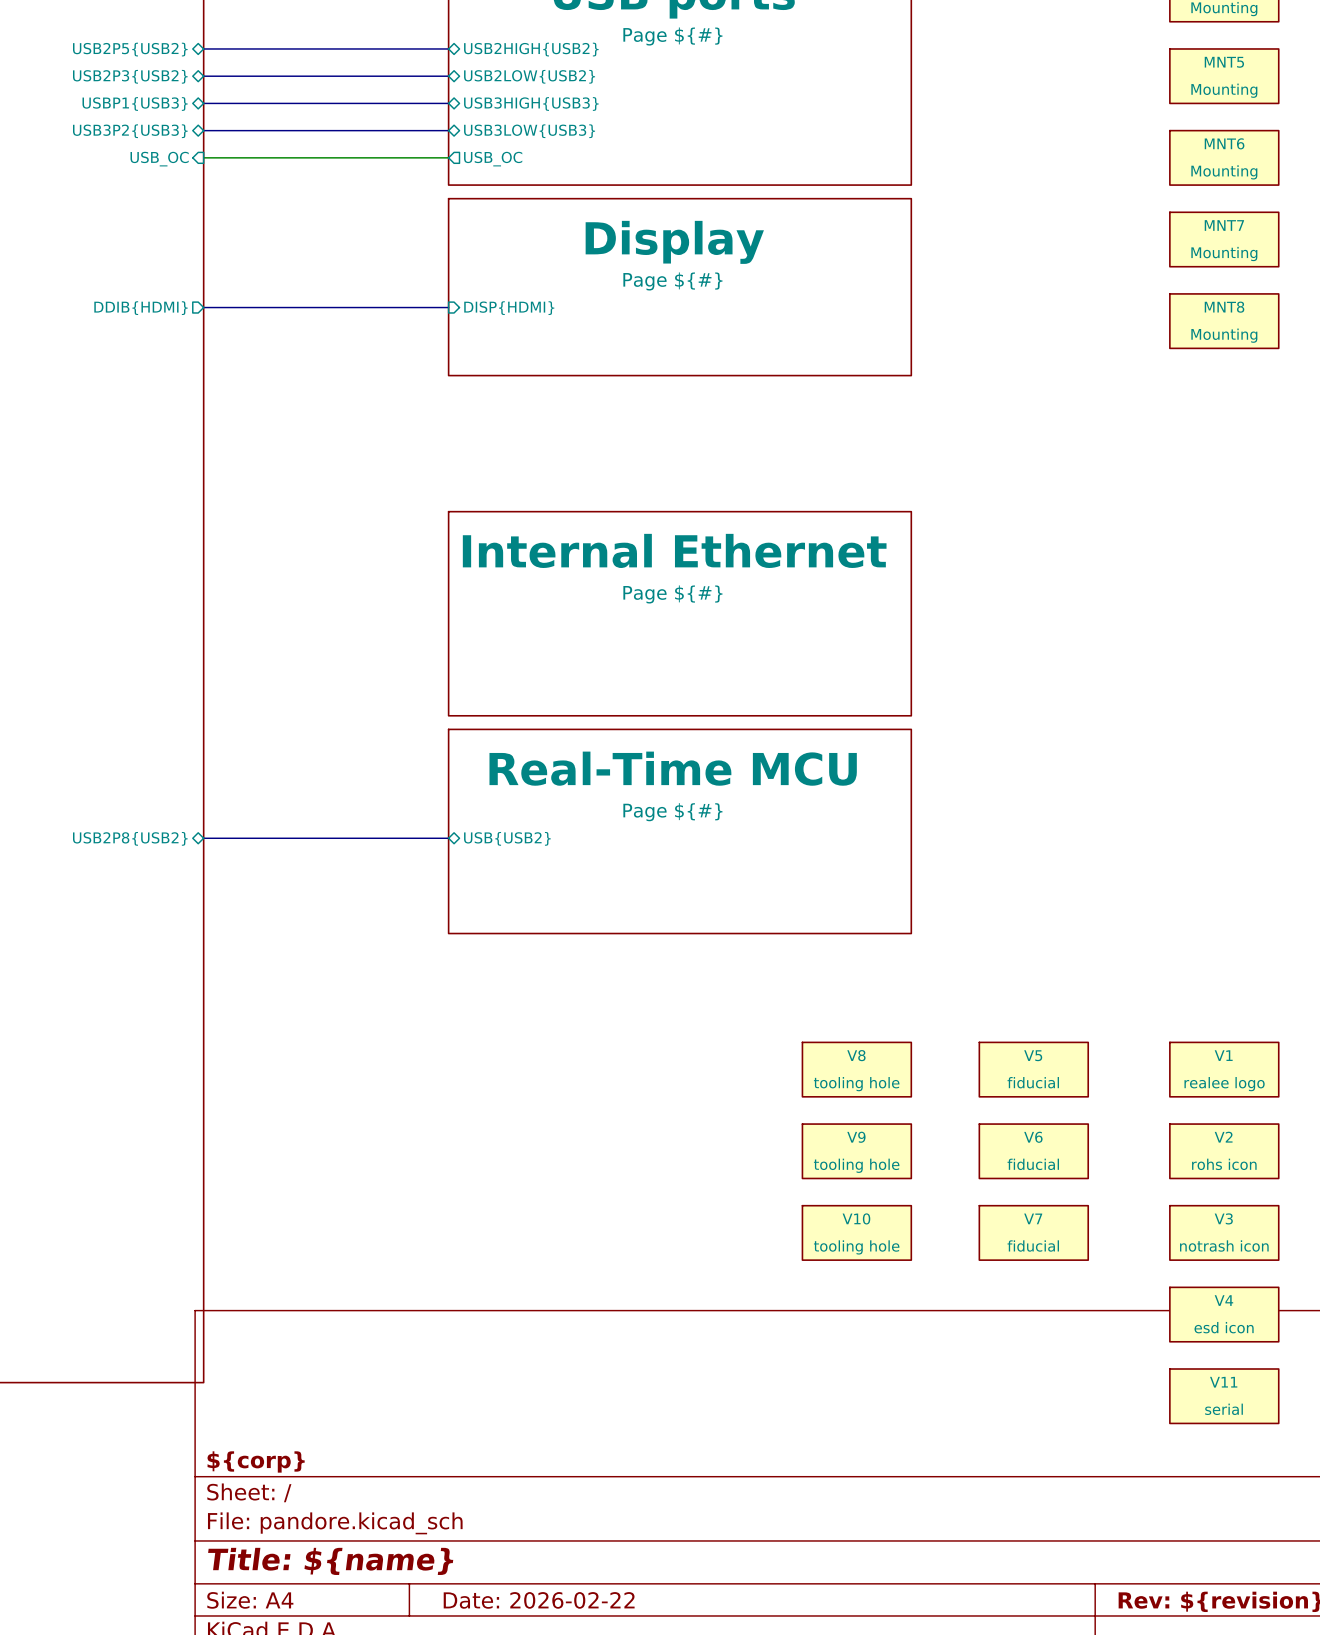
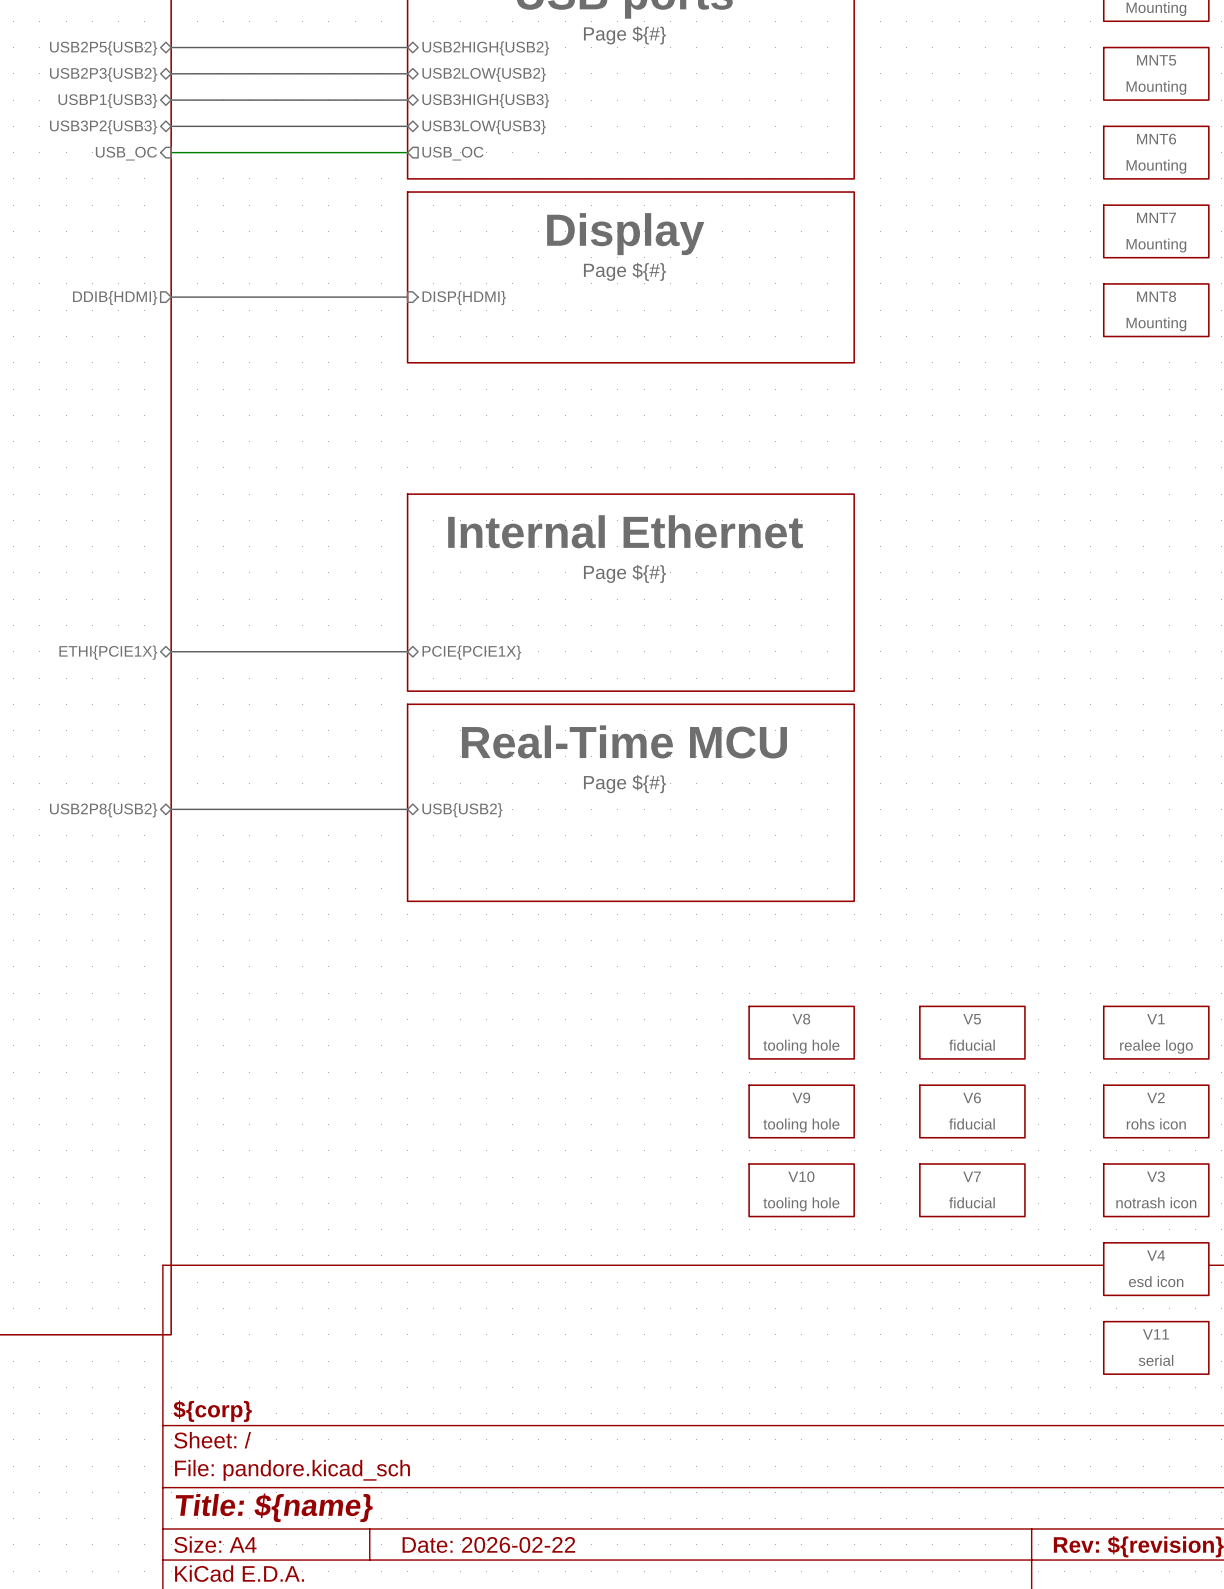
bus: none -> (171, 651) (407, 651)
sheet pin: none -> ETHI{PCIE1X} (108, 652)
sheet pin: none -> PCIE{PCIE1X} (471, 652)

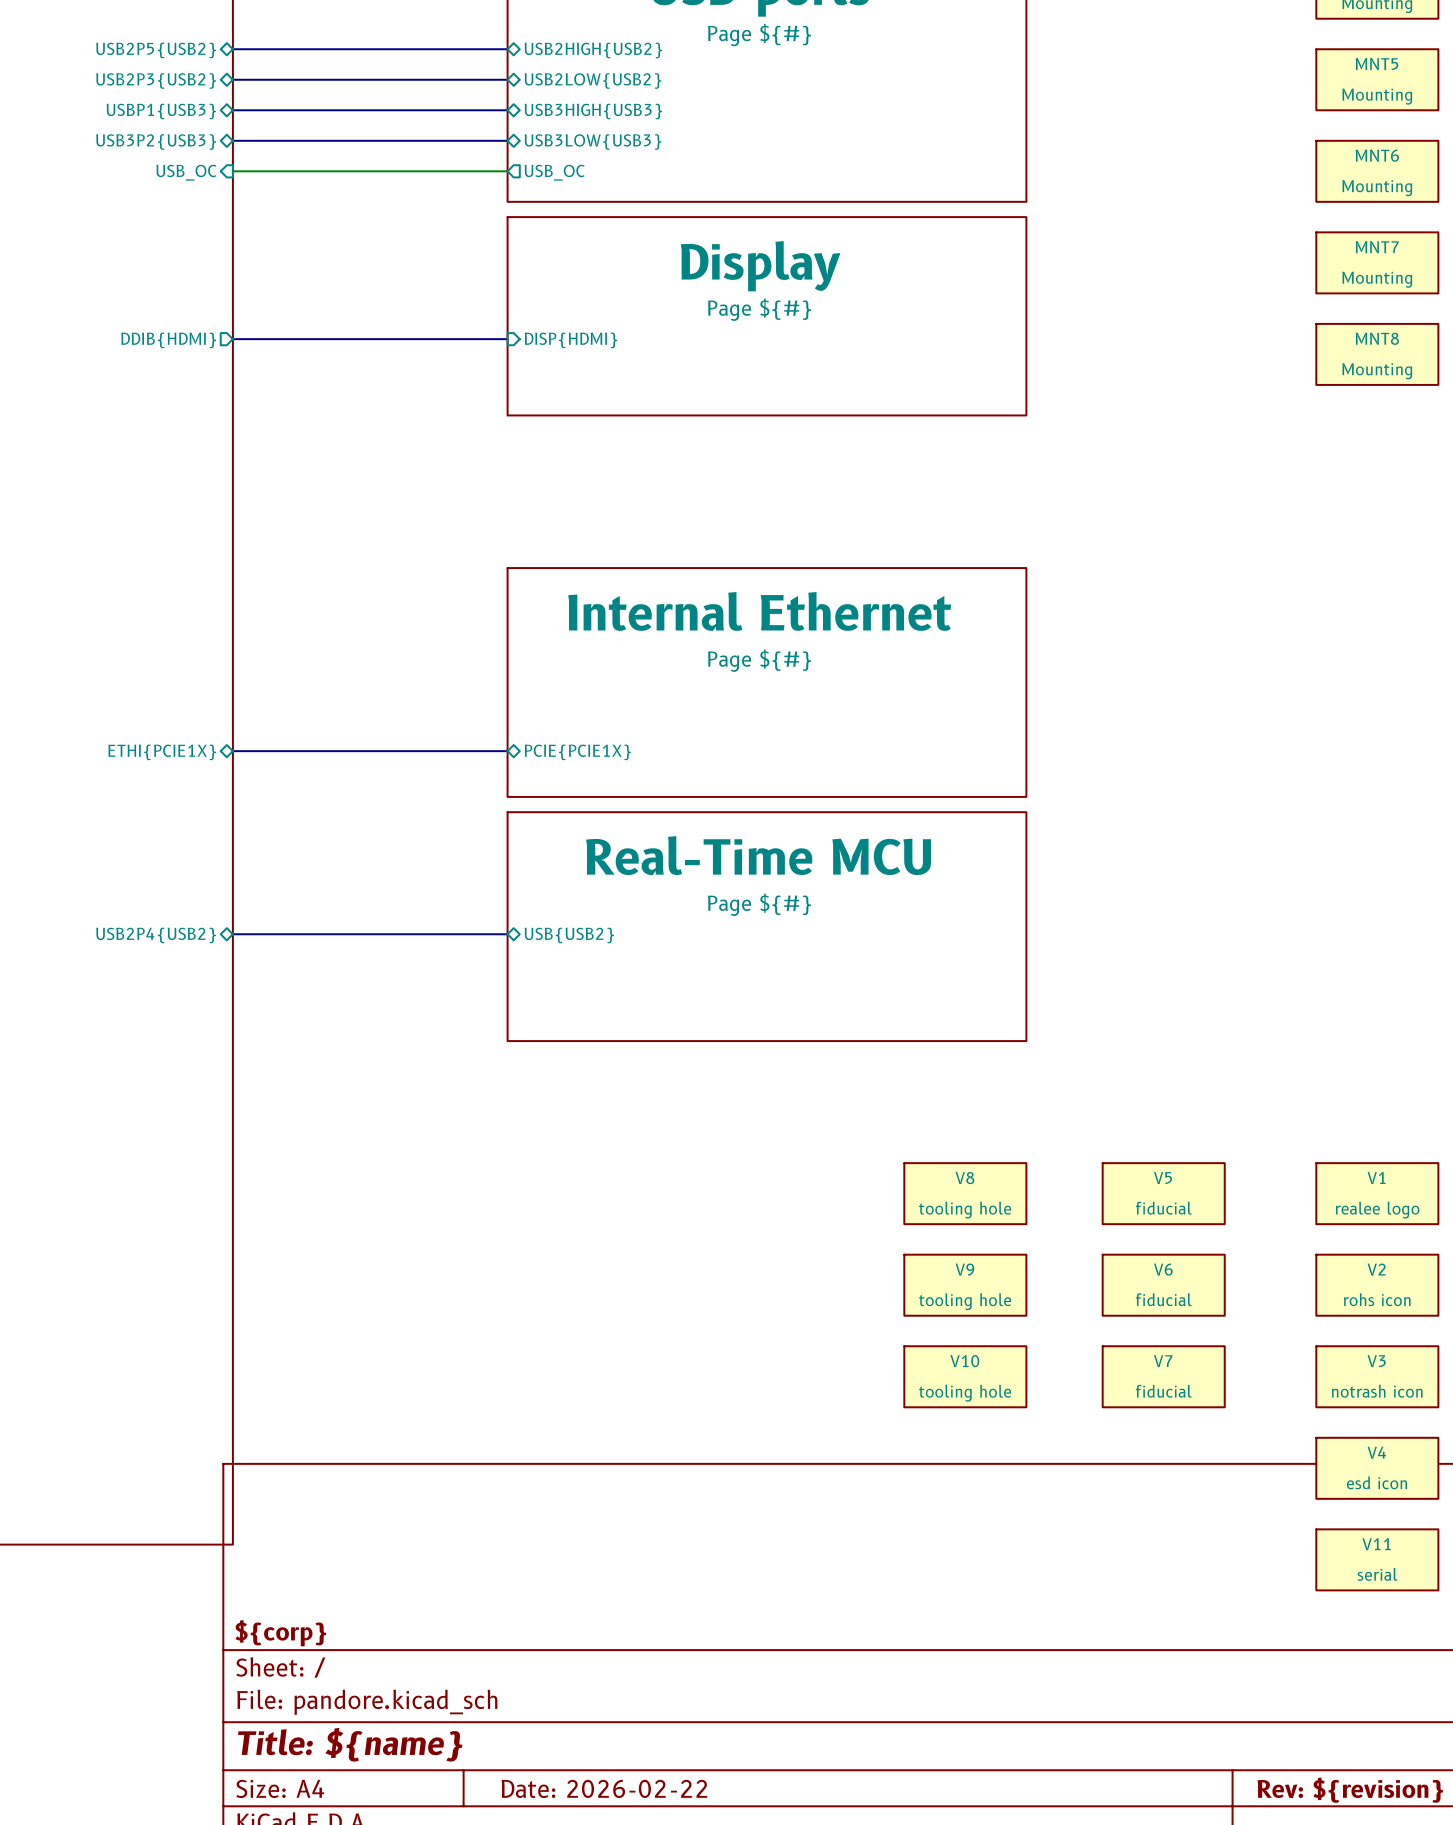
sheet pin: USB2P8{USB2} (103, 810) -> USB2P4{USB2} (156, 935)

